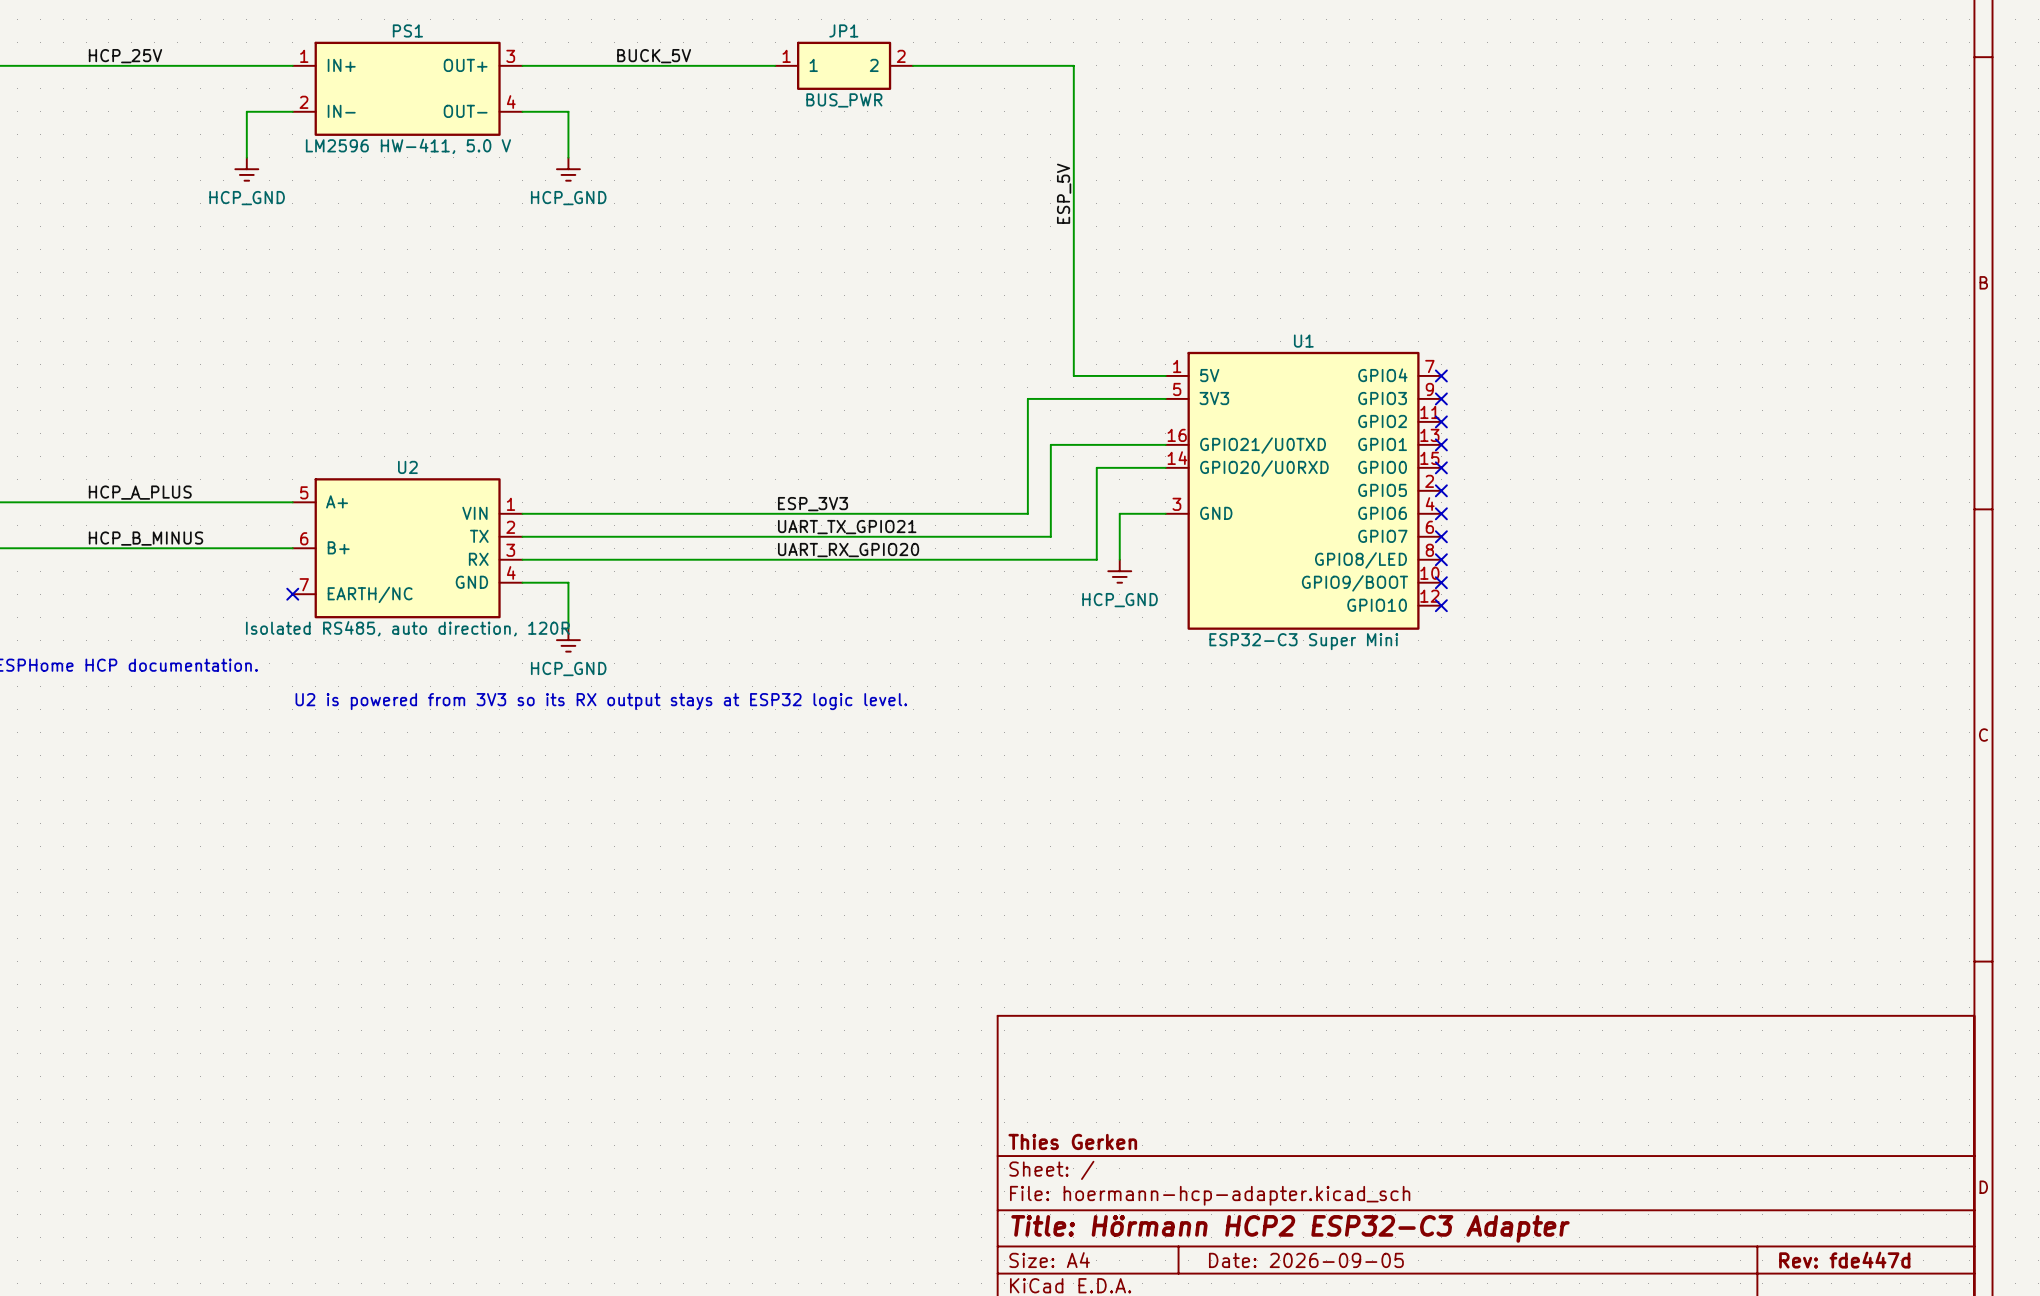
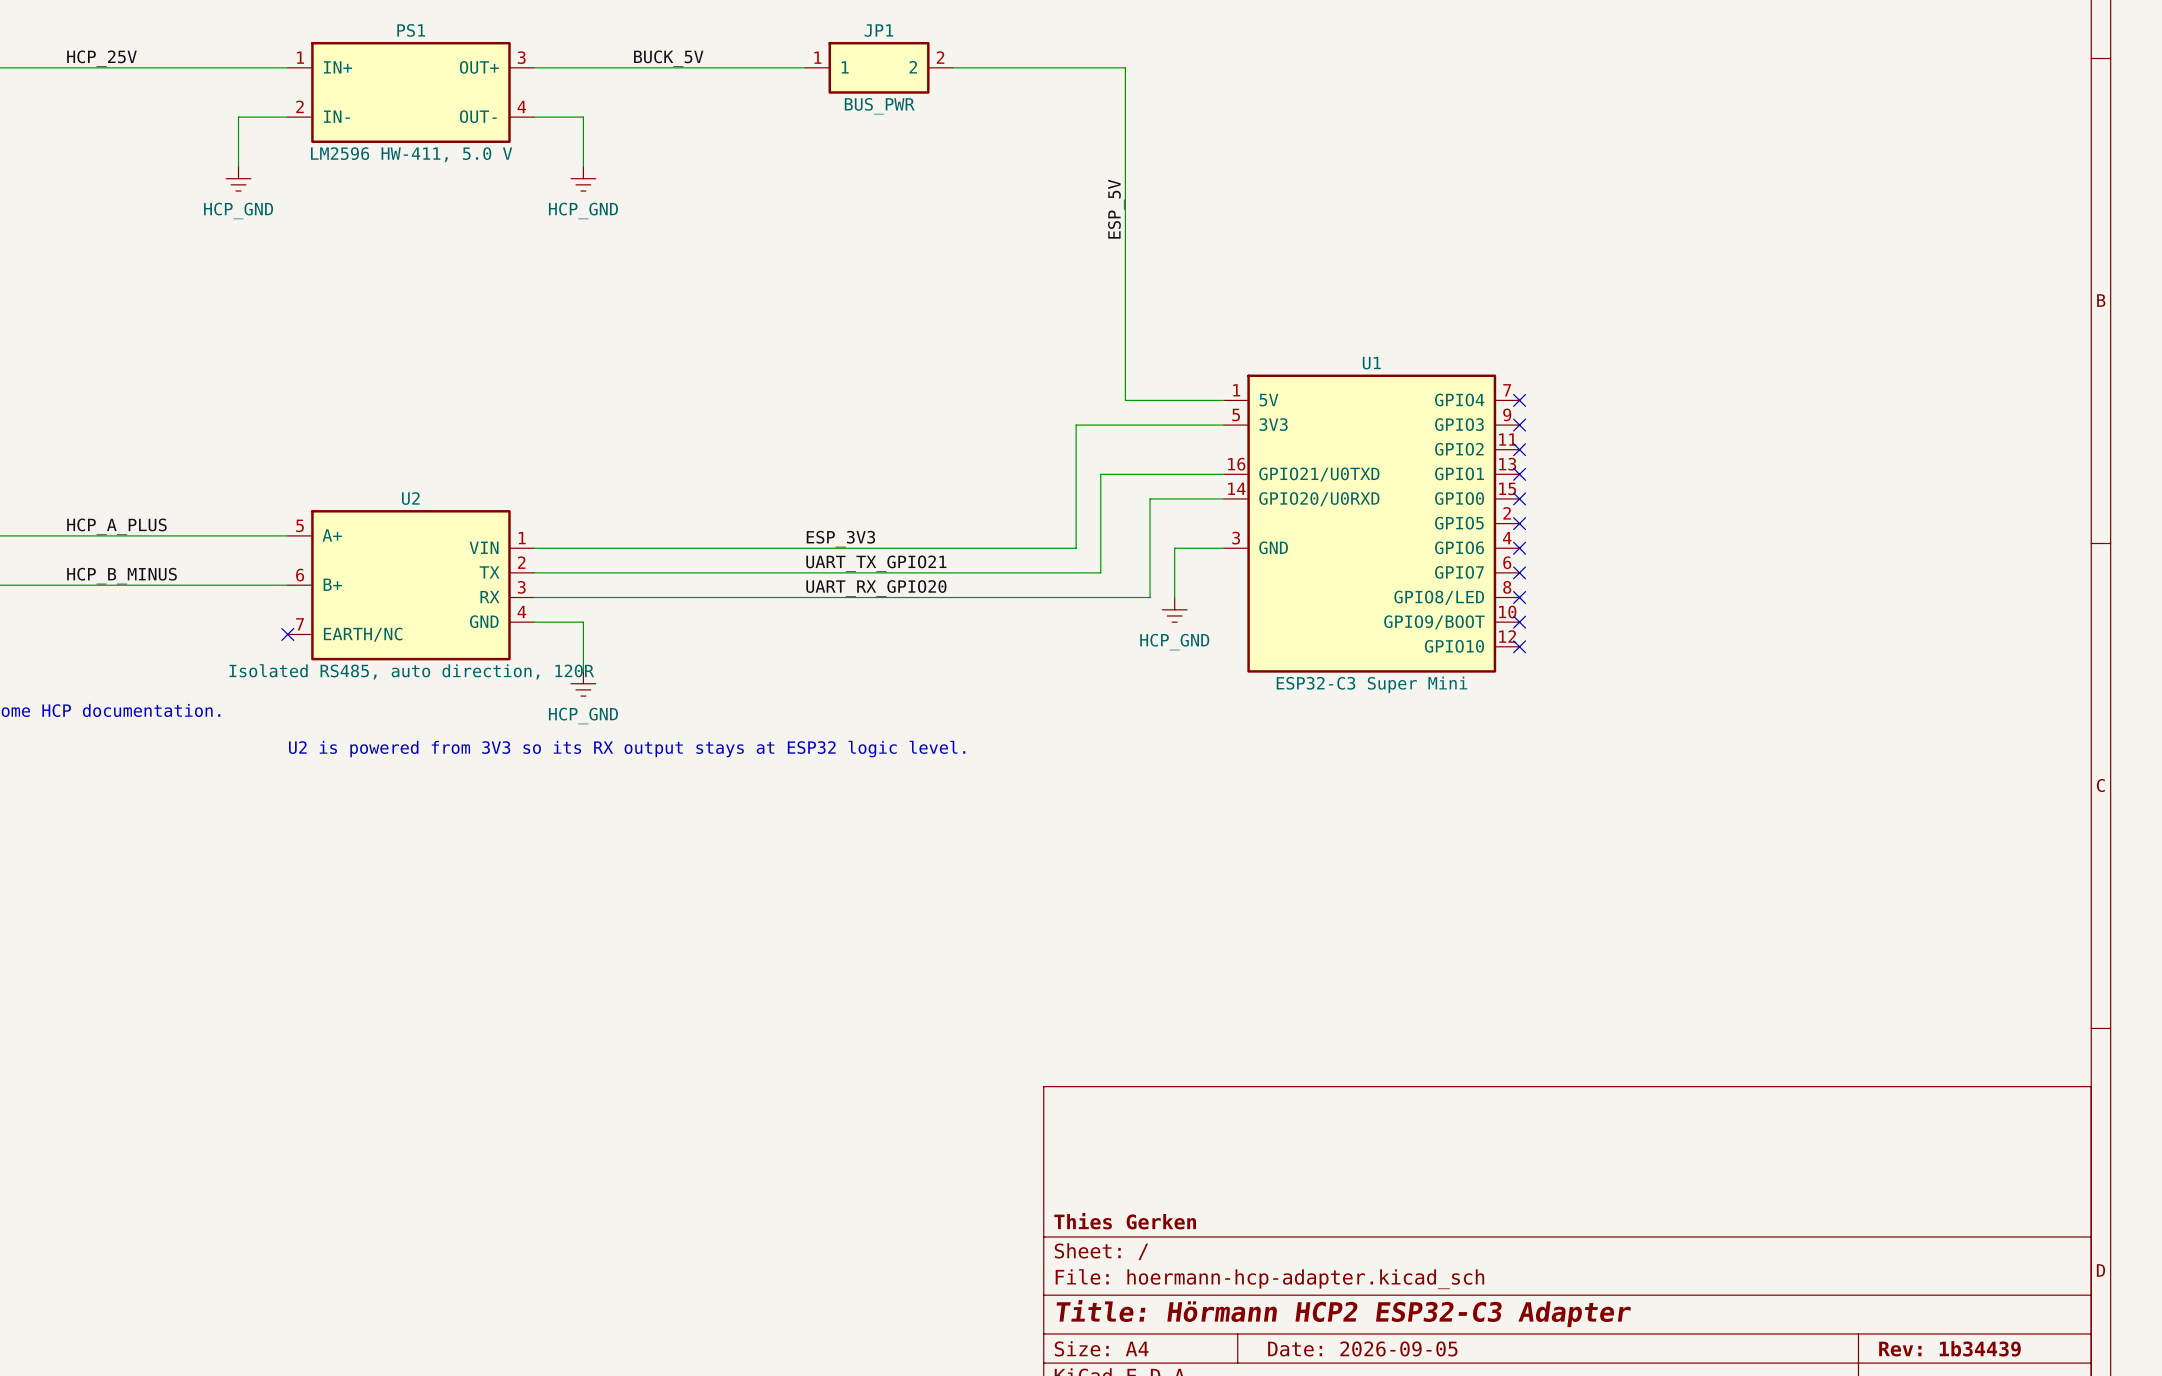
title block: Rev: fde447d (1844, 1260) -> Rev: 1b34439 (1949, 1348)

